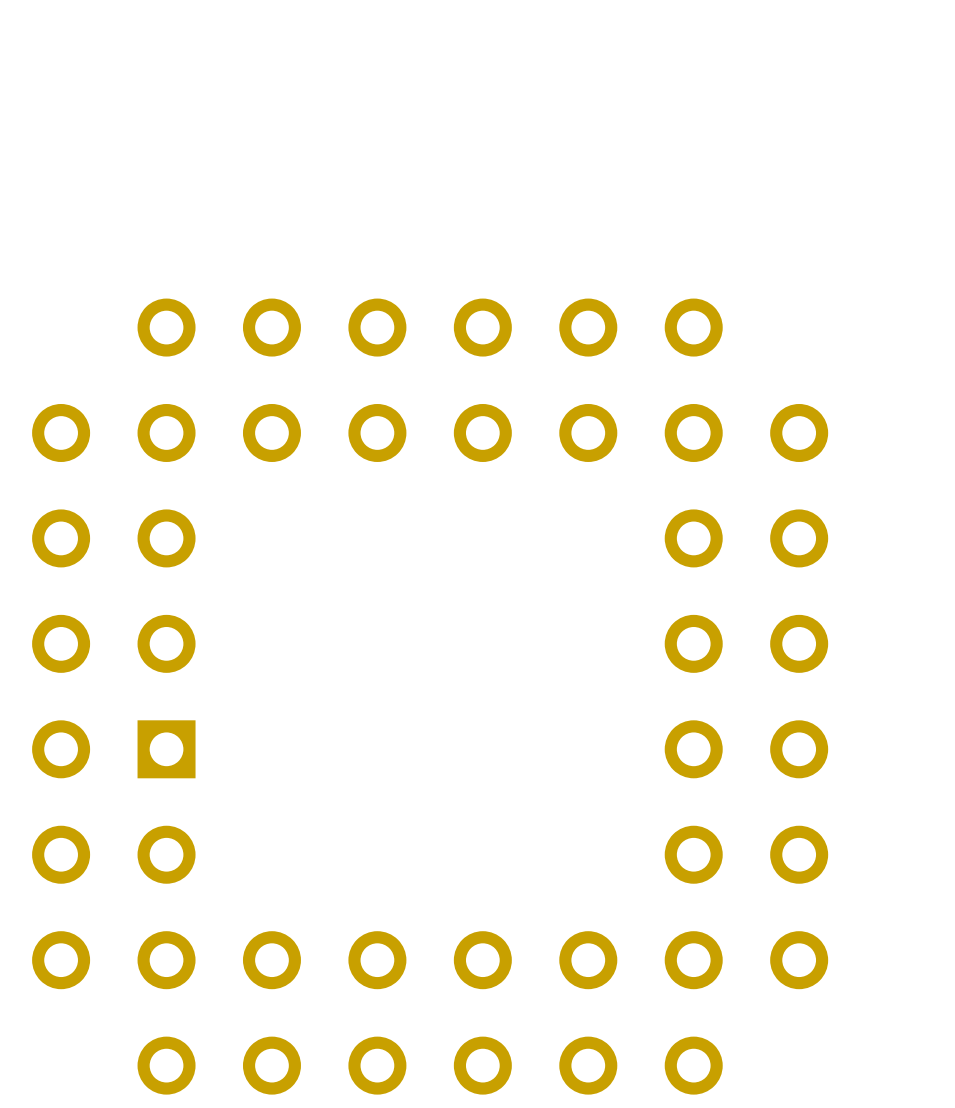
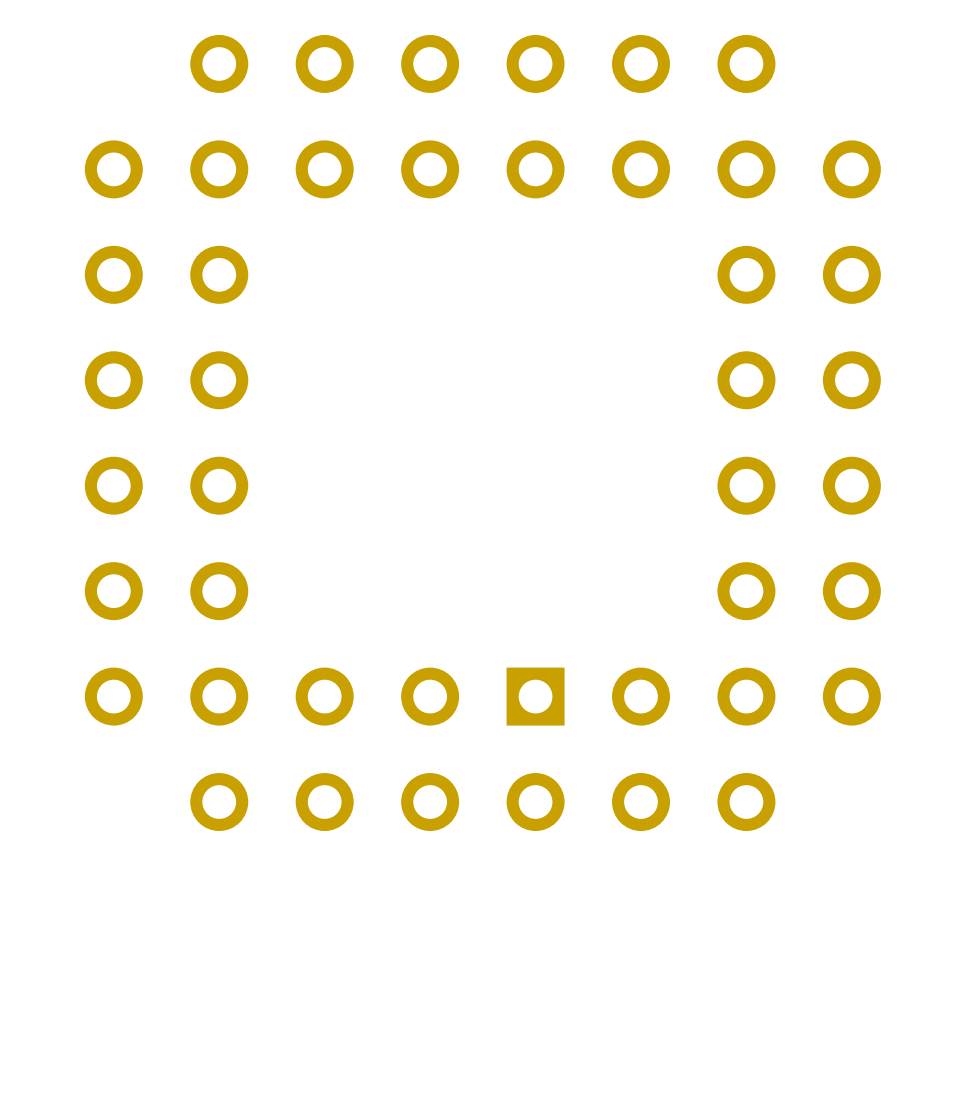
part rotation: 0° (430, 696) -> 90° counterclockwise (482, 432)

